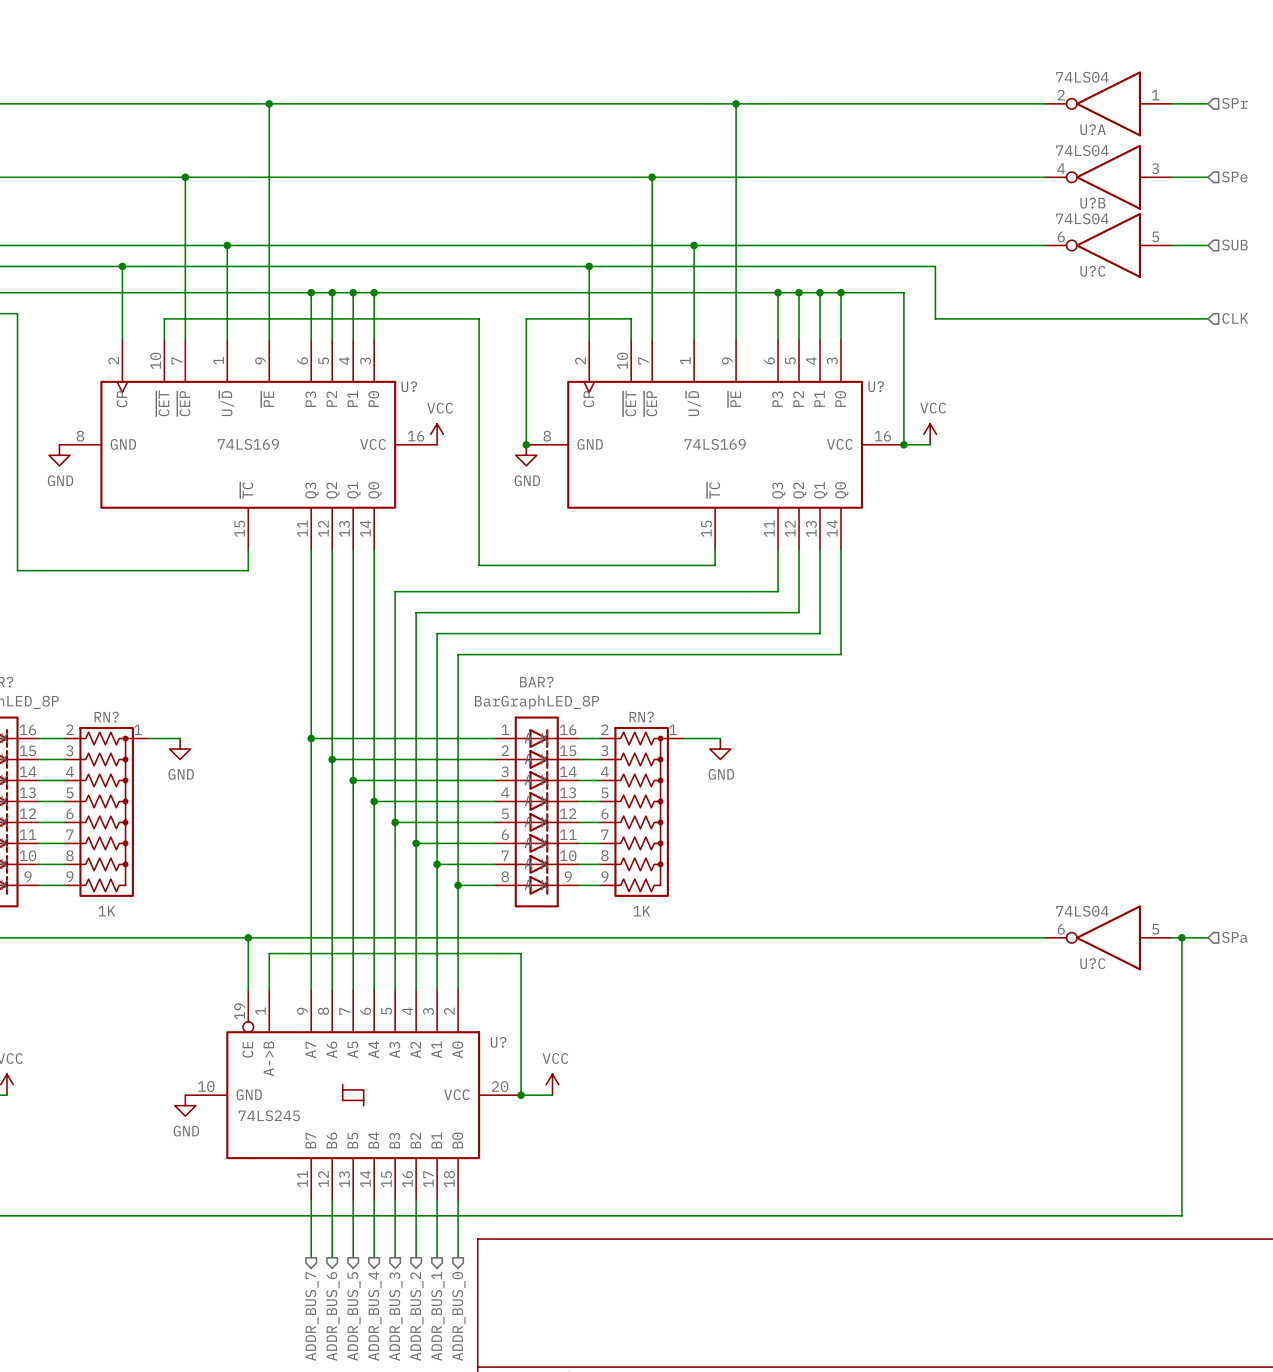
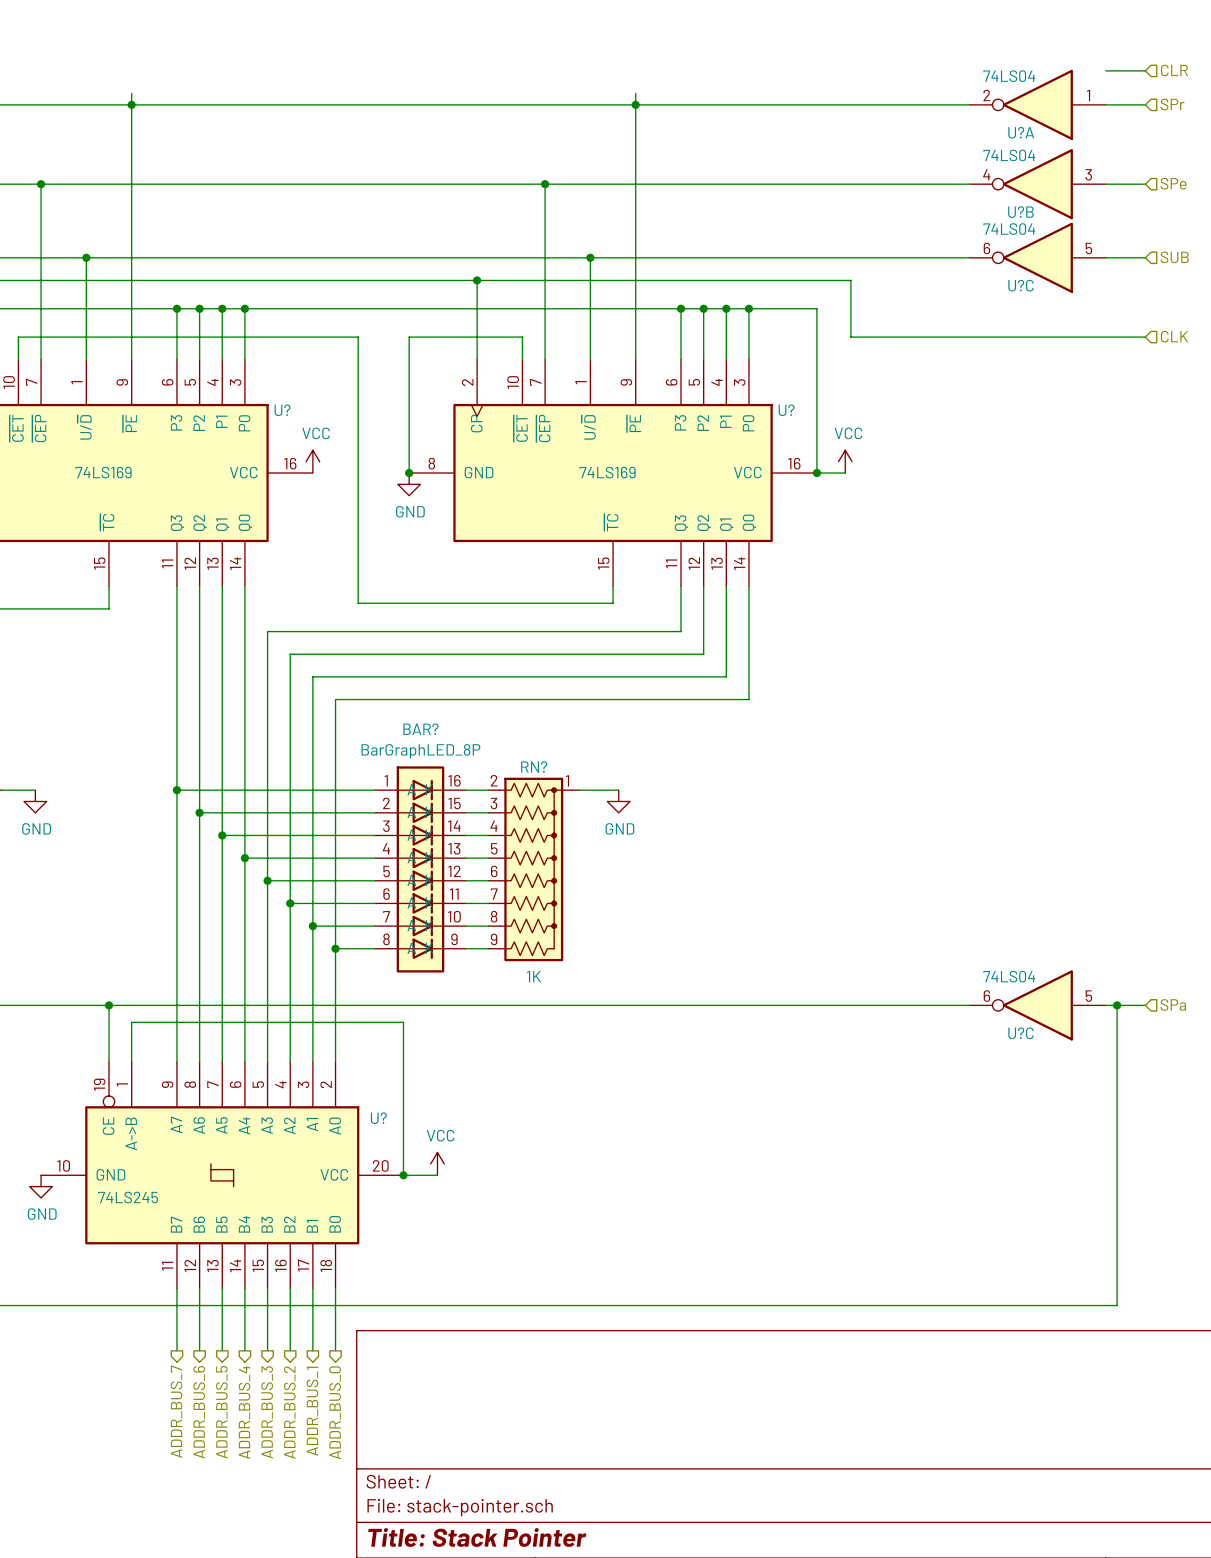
wire: none -> (1105, 70) (1145, 70)
hierarchical label: none -> CLR (1174, 70)
wire: none -> (131, 93) (131, 104)
wire: none -> (635, 93) (635, 104)

